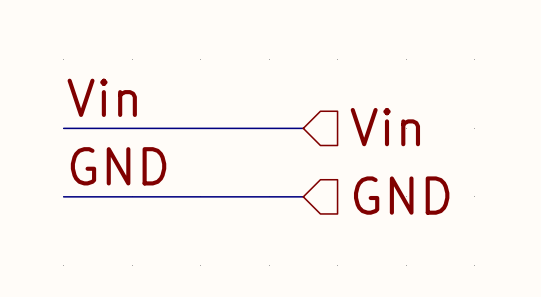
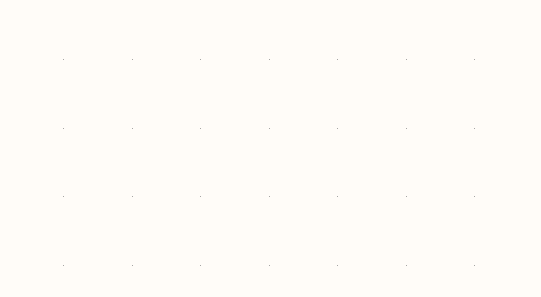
label: Vin (102, 97) -> none
hierarchical label: Vin (385, 127) -> none
wire: (63, 128) (303, 128) -> none
label: GND (118, 166) -> none
hierarchical label: GND (401, 195) -> none
wire: (63, 196) (303, 196) -> none

